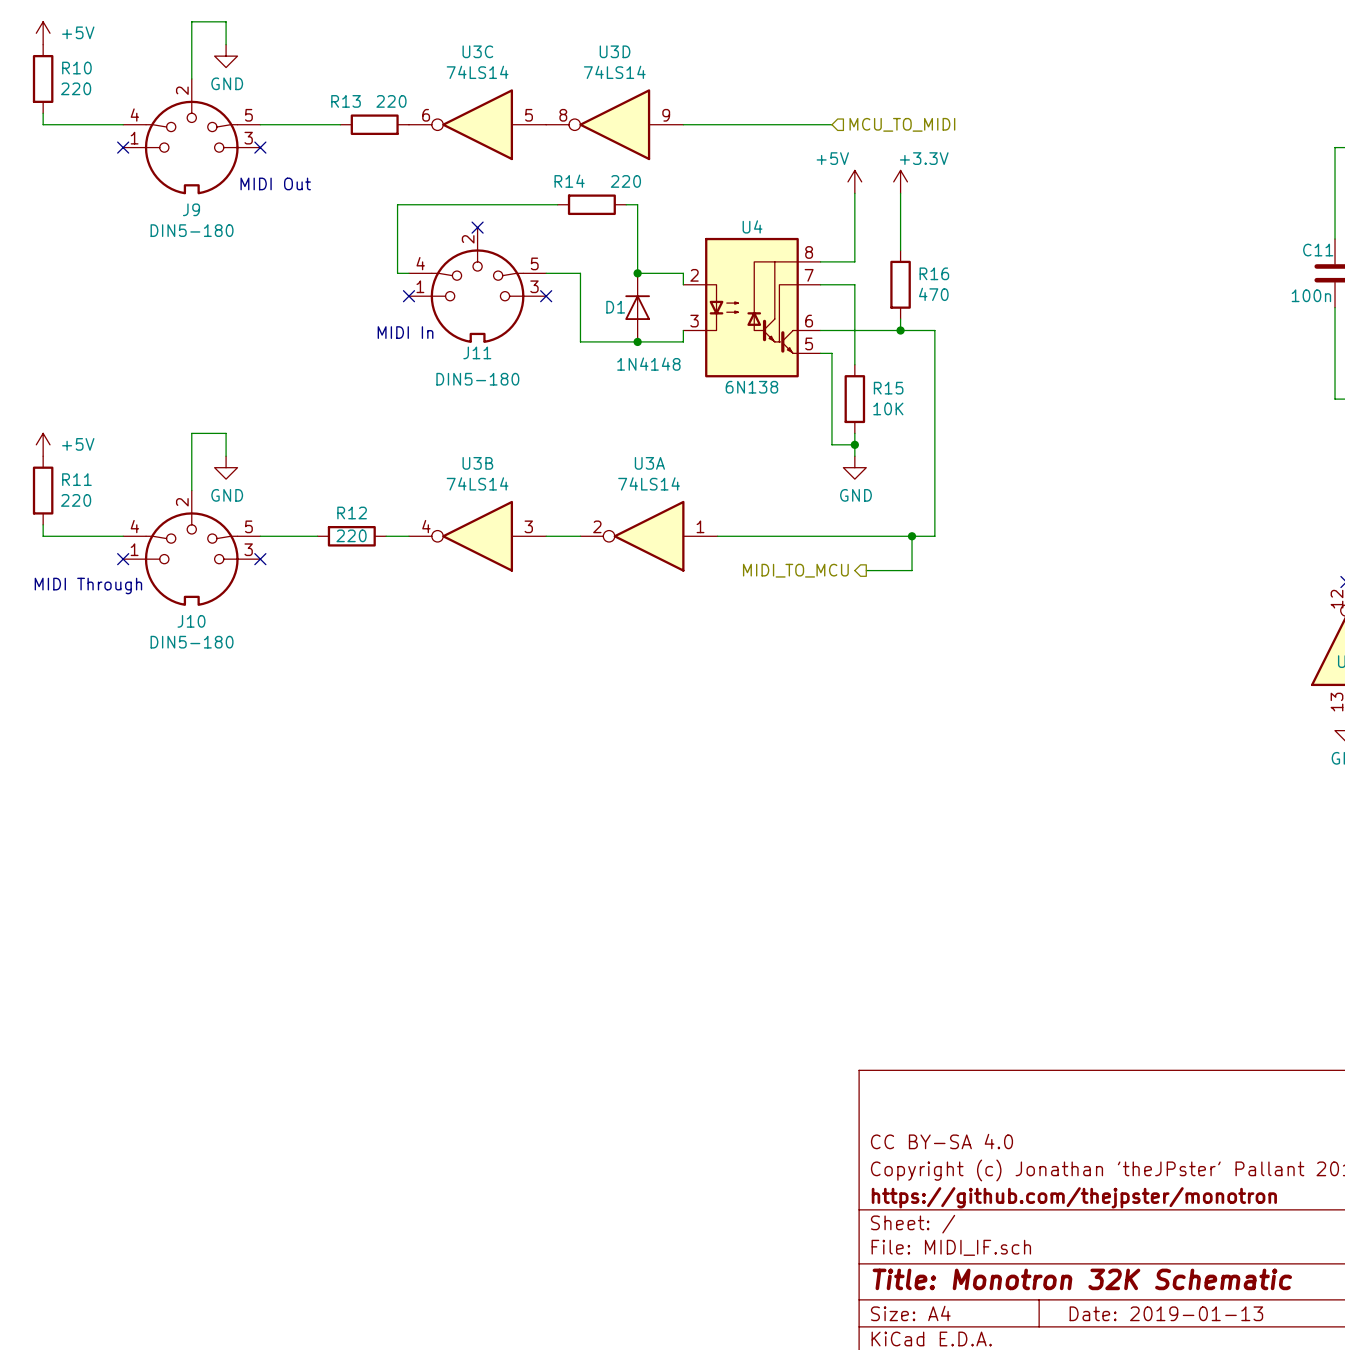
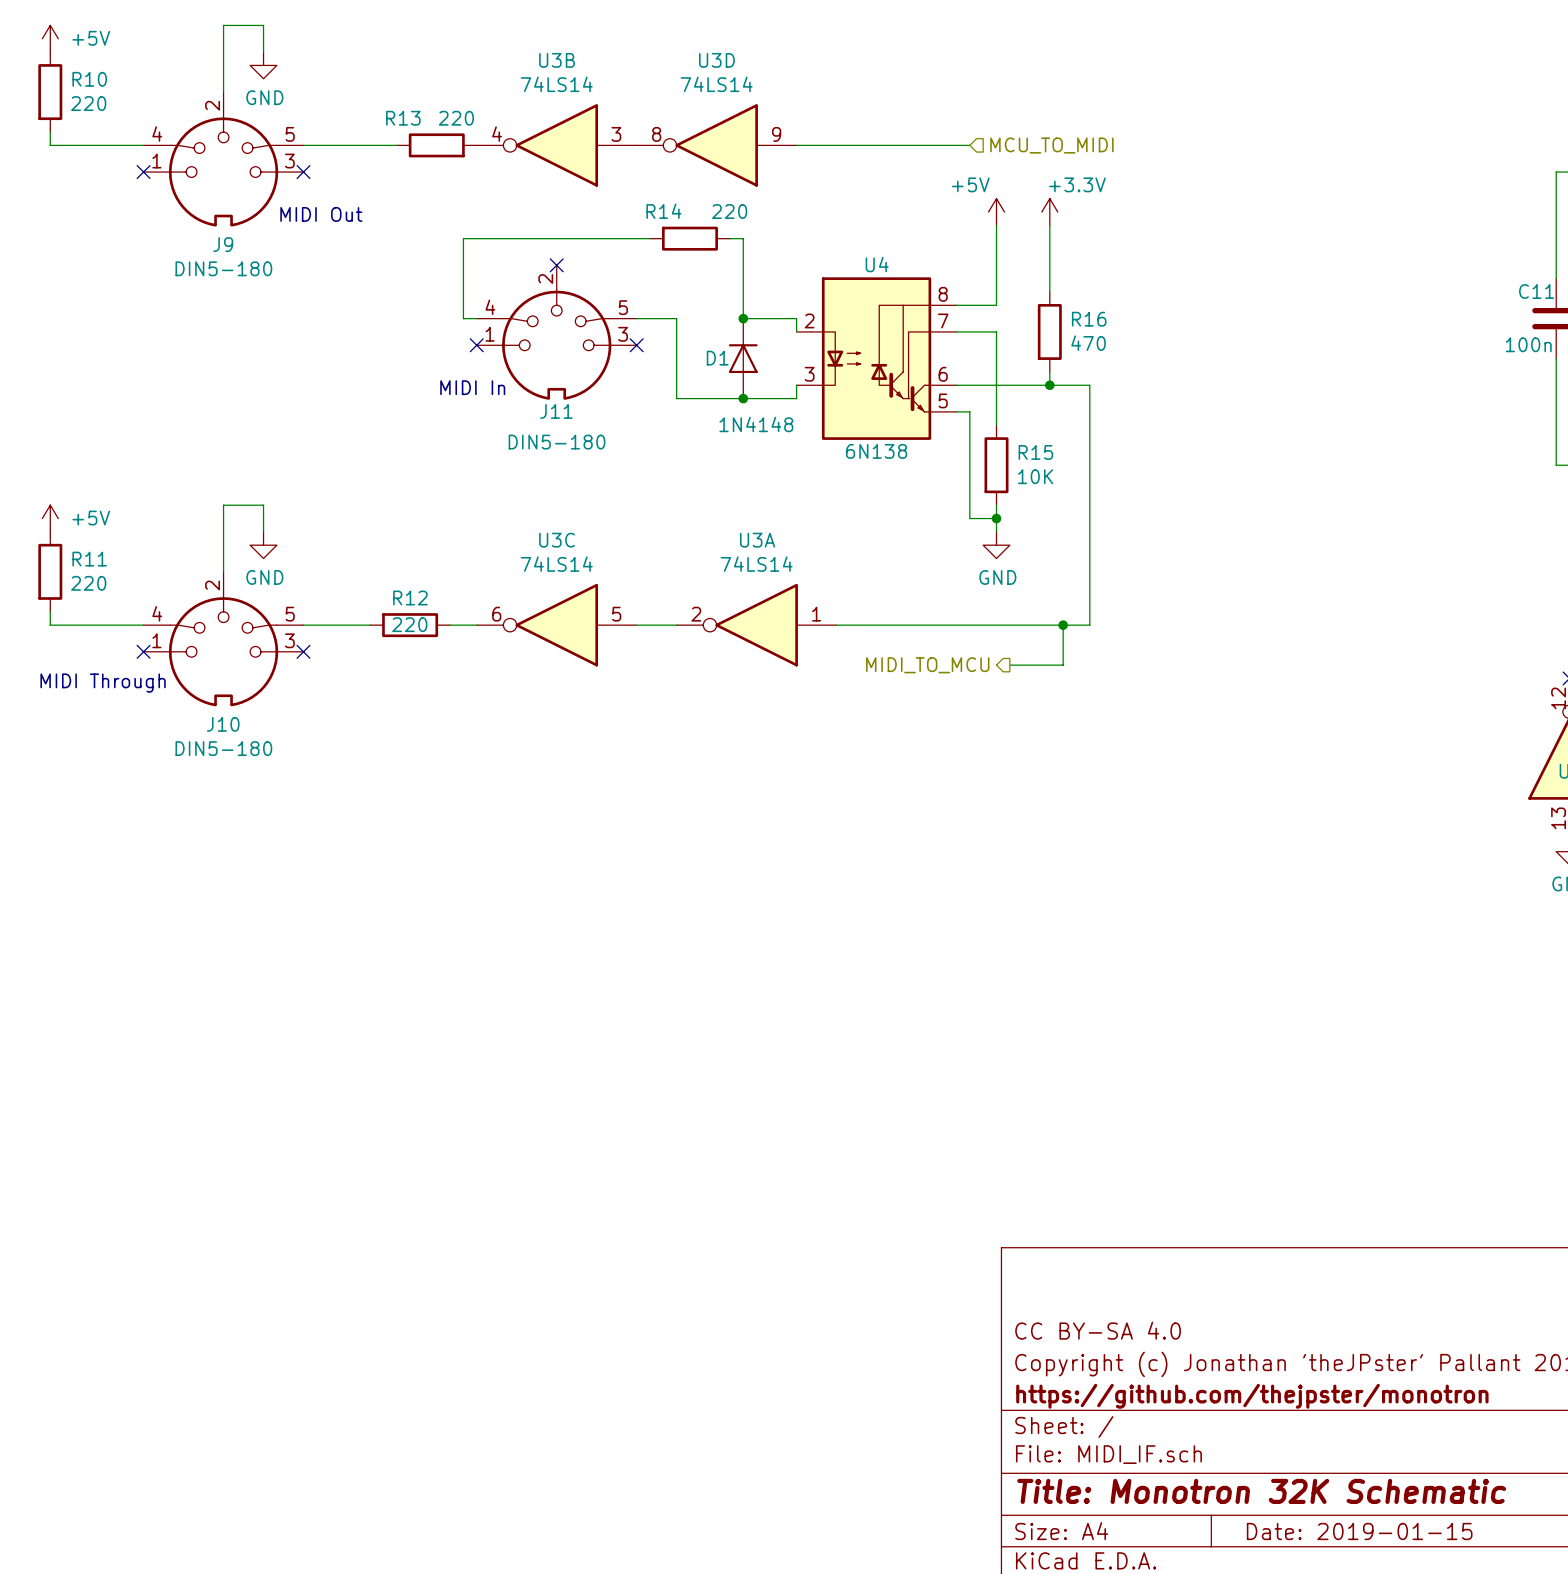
U3C position: (477, 124) -> (556, 625)
U3B position: (477, 536) -> (556, 145)
title block: Date: 2019-01-13 (1166, 1313) -> Date: 2019-01-15 (1359, 1531)

